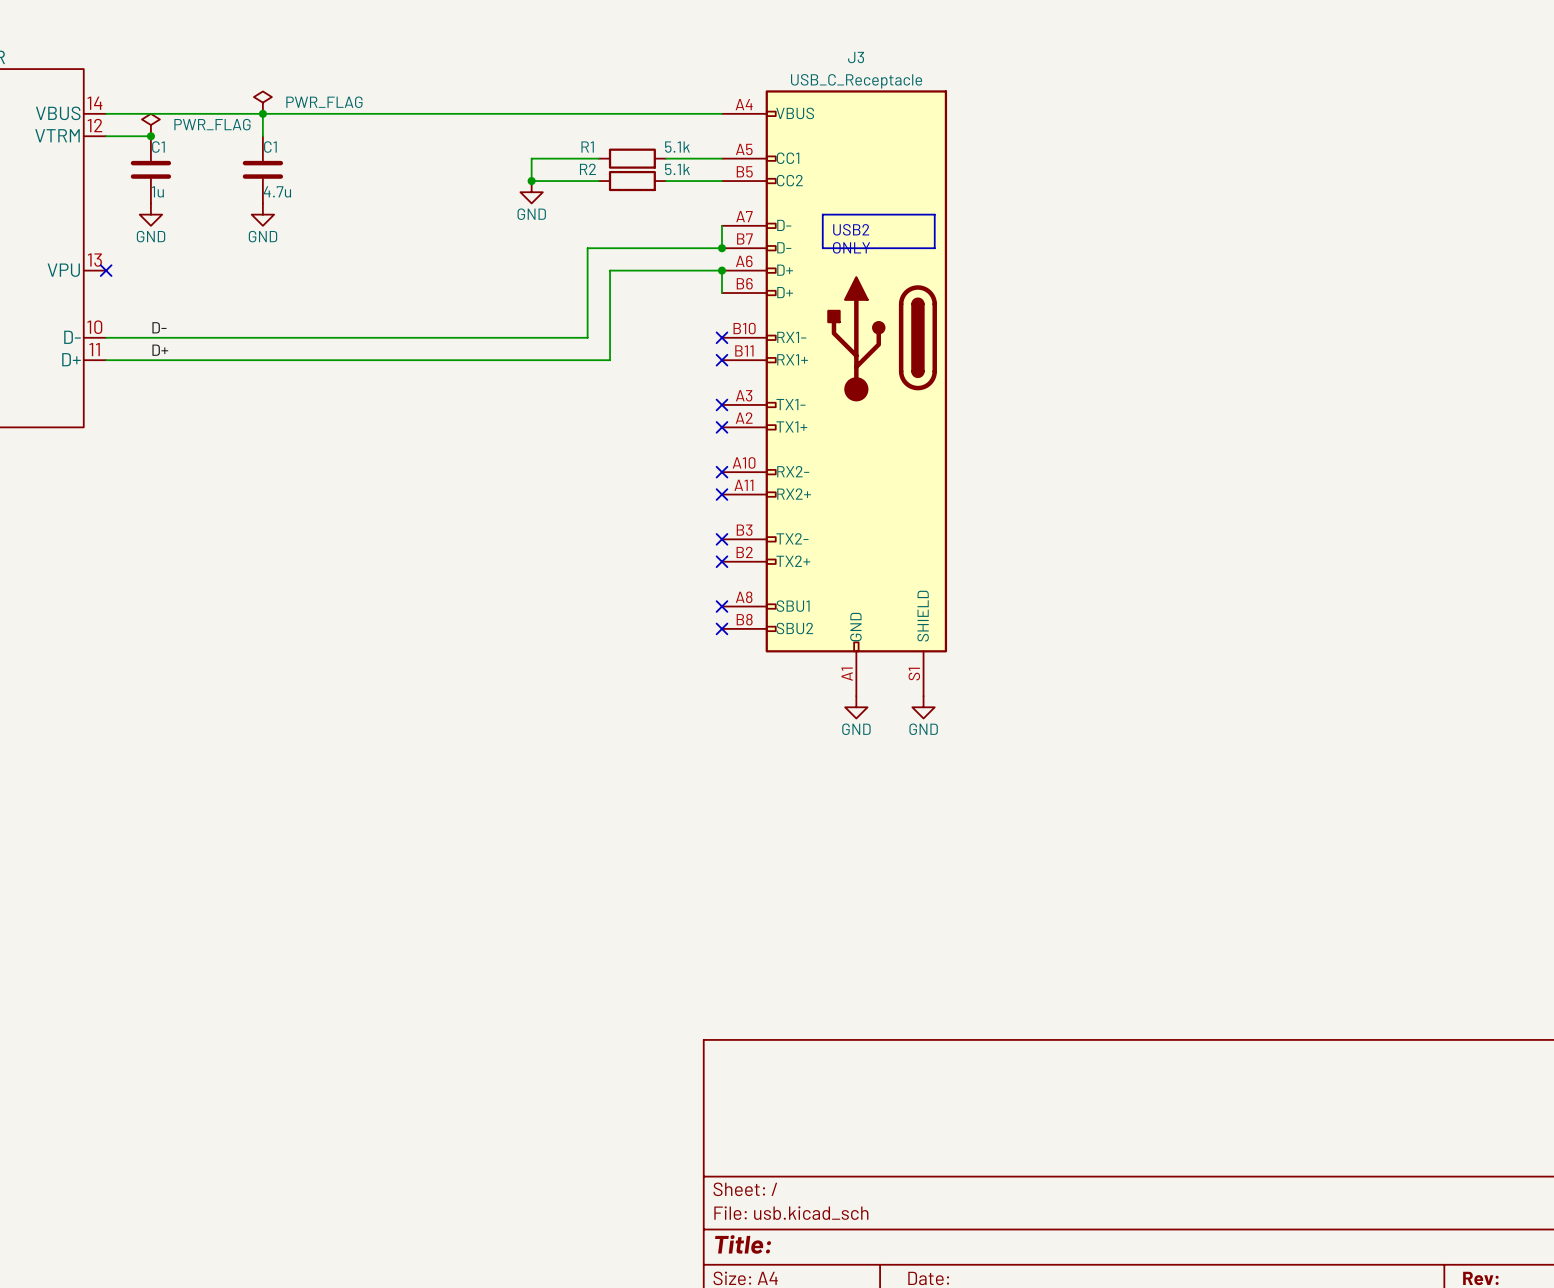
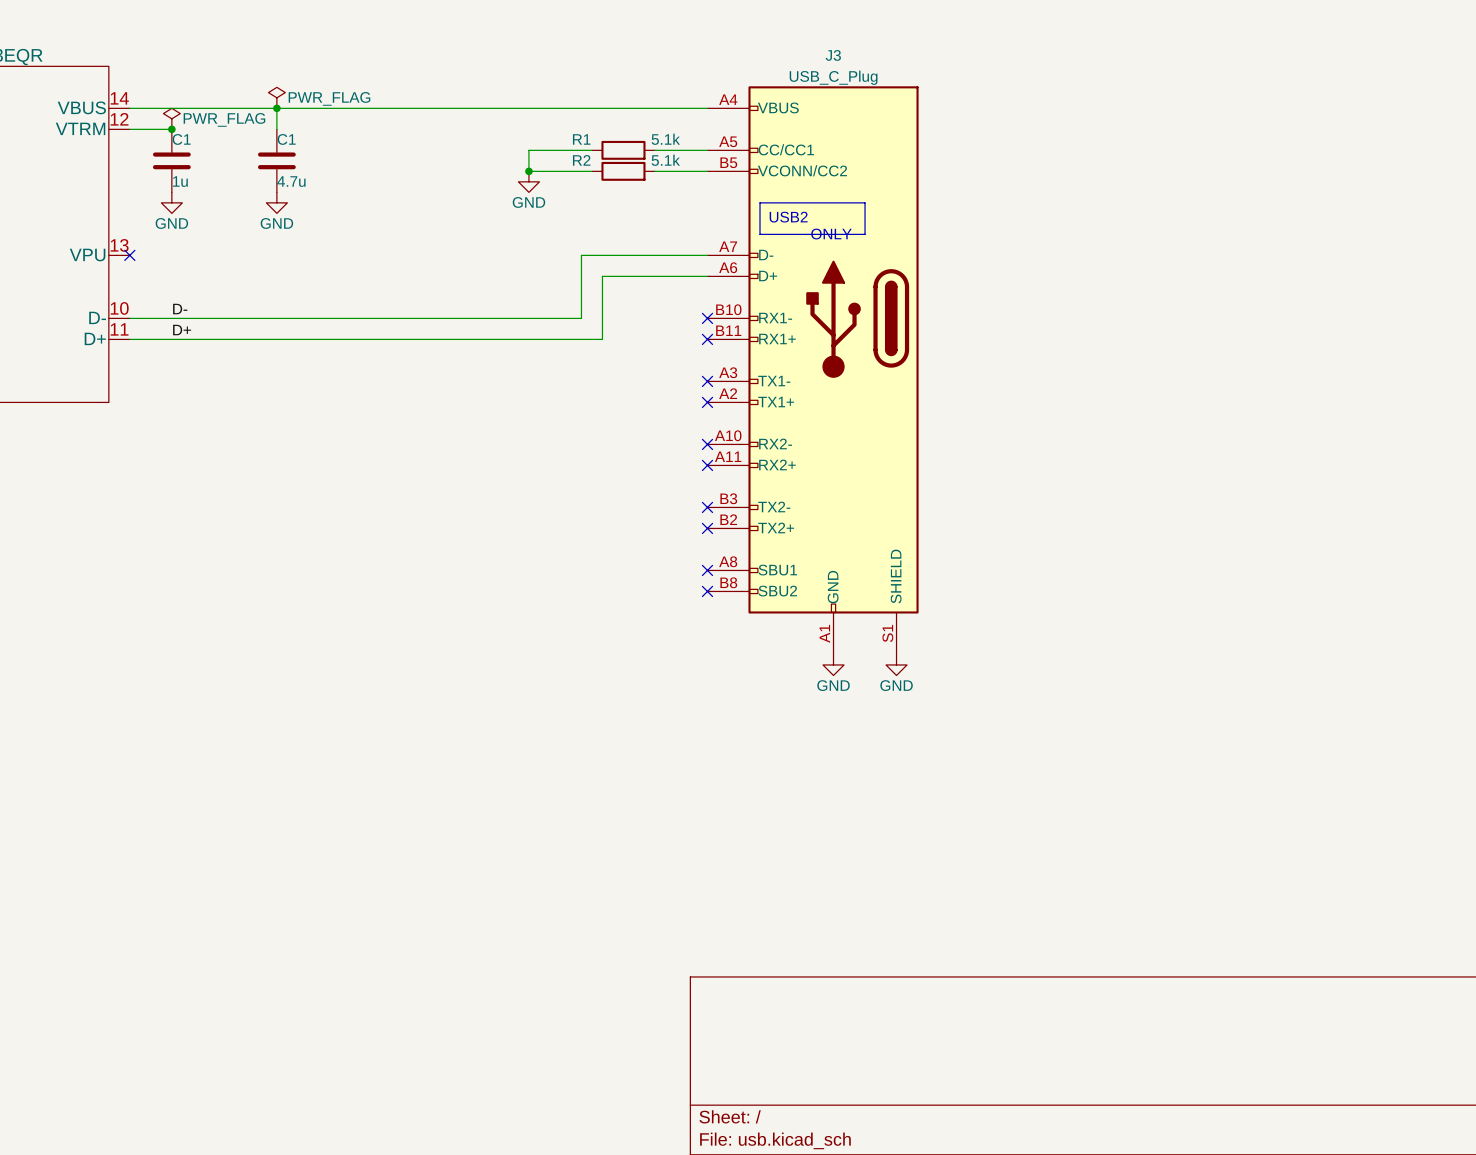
J3 value: USB_C_Receptacle (856, 81) -> USB_C_Plug (833, 77)
J3 symbol: [721, 90, 948, 697] -> [707, 86, 919, 655]
line: (822, 214) (822, 248) -> (802, 202) (760, 202) (760, 234) (802, 234)
line: (889, 214) (934, 214) (934, 248) (889, 248) -> (865, 202) (865, 234)
wire: (721, 225) (721, 248) (587, 248) (587, 270) -> none
text position: USB2 (851, 229) -> USB2 (788, 217)
junction: (721, 248) -> none
wire: (610, 270) (610, 293) -> (602, 255) (581, 255)
wire: (721, 270) (721, 293) -> (602, 276) (707, 276)
junction: (721, 270) -> none

